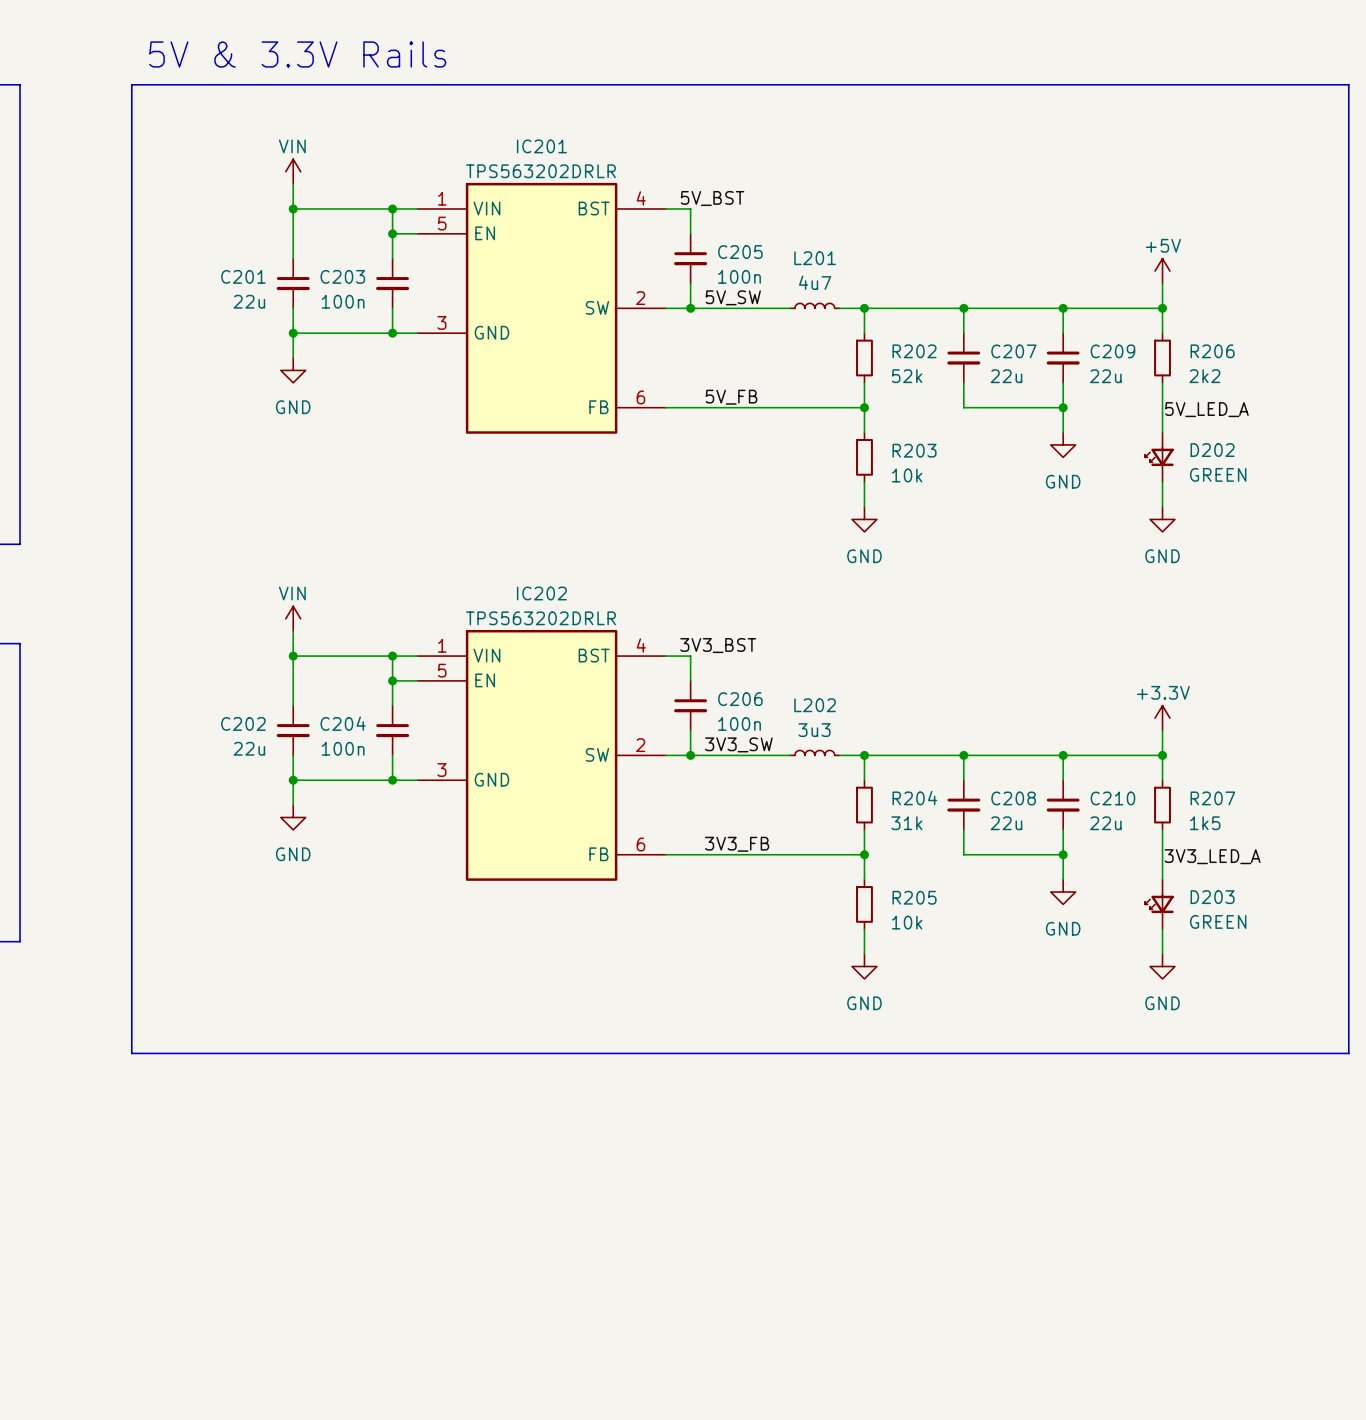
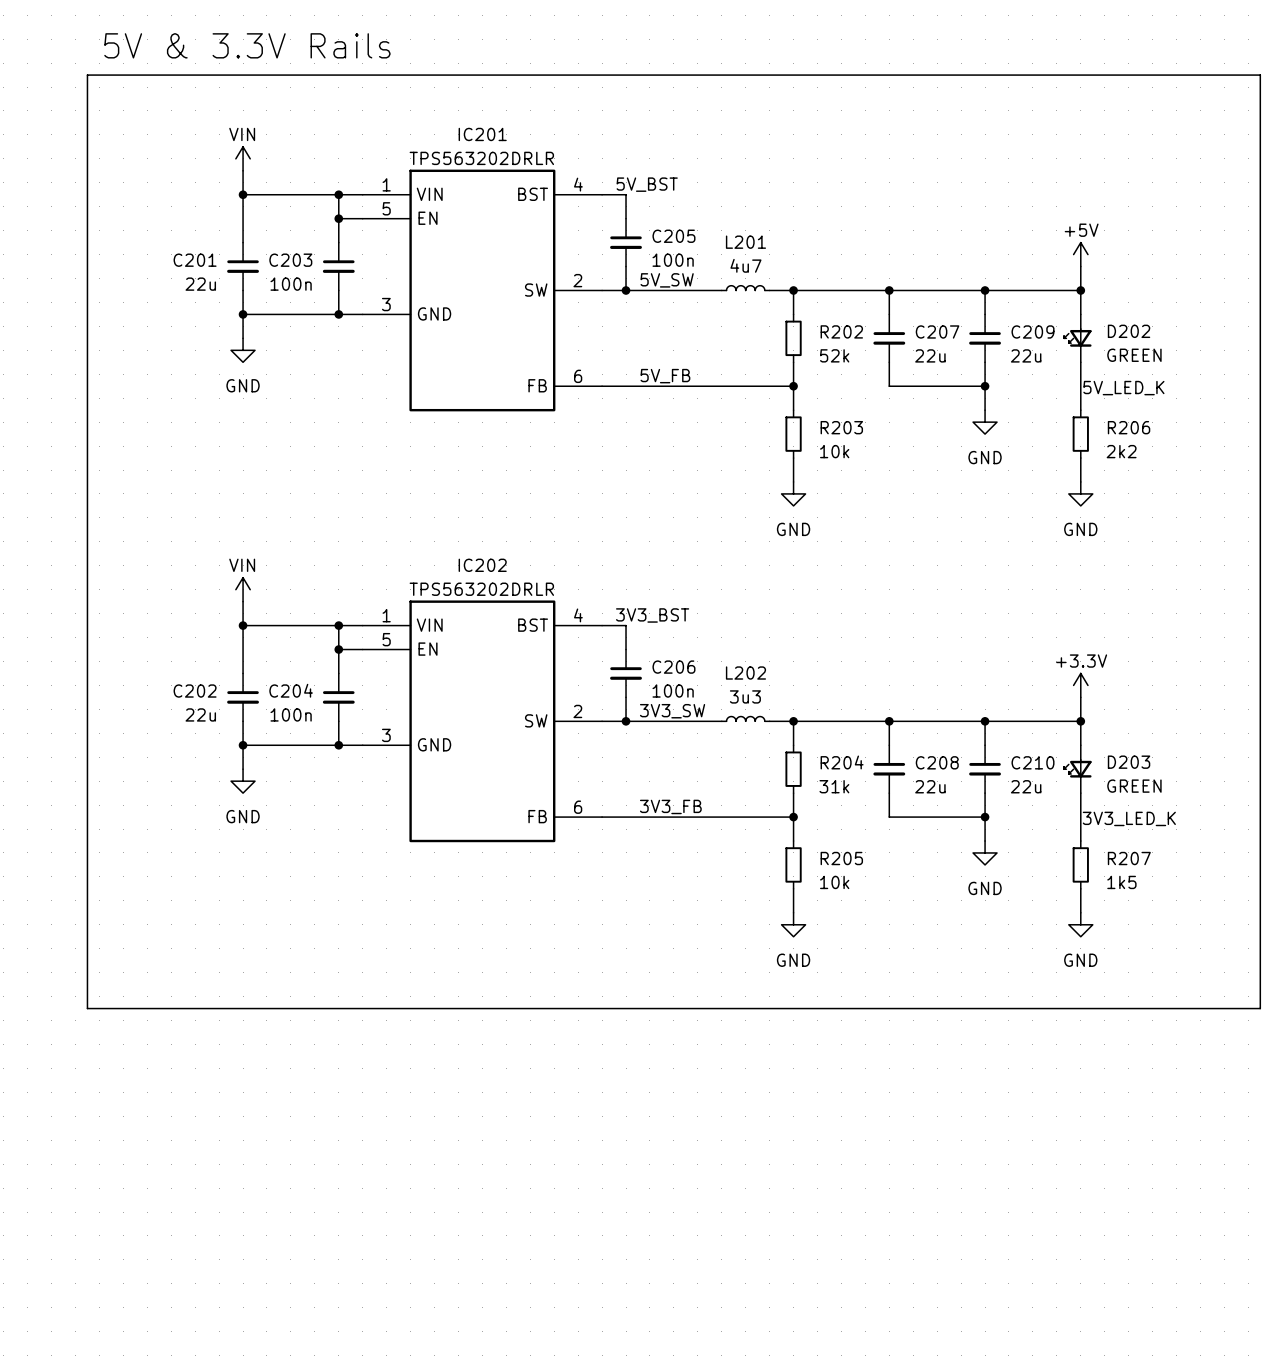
R206 position: (1162, 358) -> (1080, 434)
label: 5V_LED_A (1206, 409) -> 5V_LED_K (1123, 388)
D202 position: (1159, 457) -> (1077, 338)
R207 position: (1162, 805) -> (1080, 864)
label: 3V3_LED_A (1212, 856) -> 3V3_LED_K (1129, 818)
D203 position: (1159, 904) -> (1077, 769)

